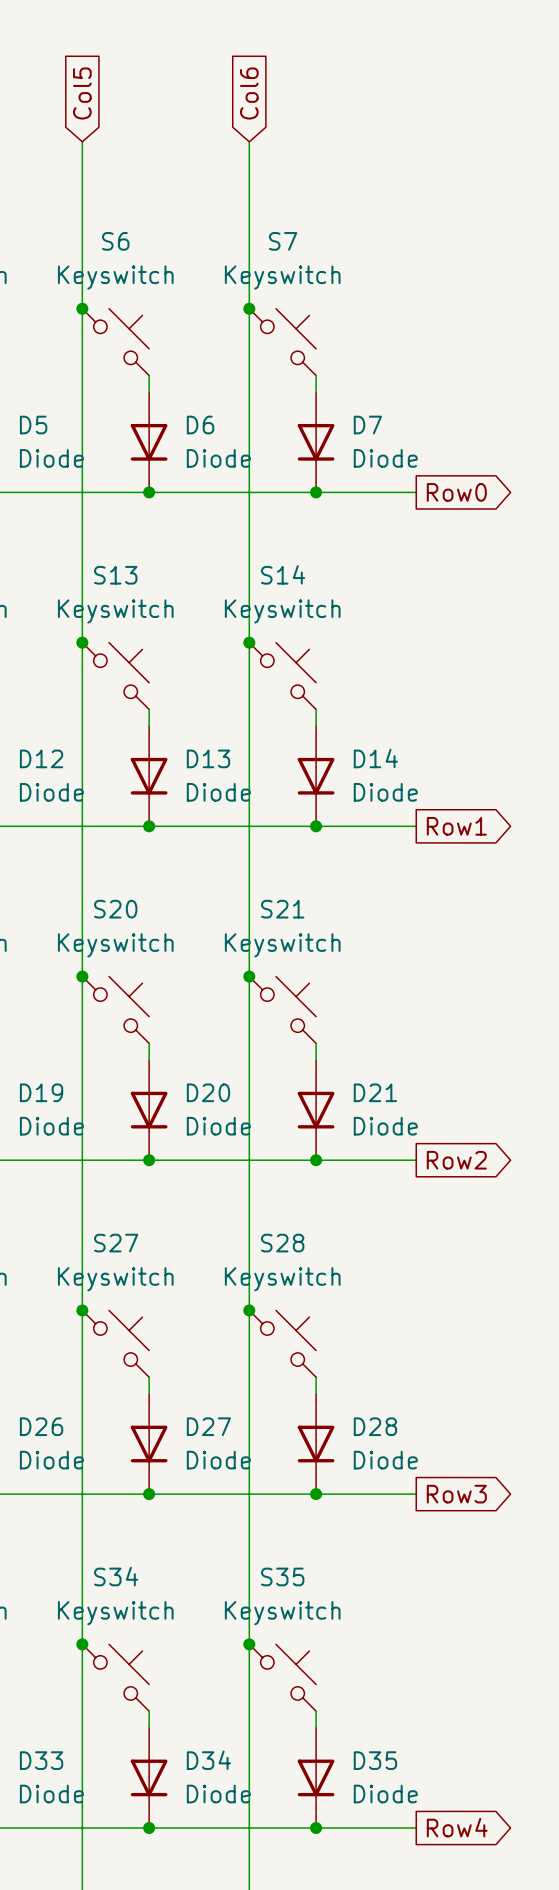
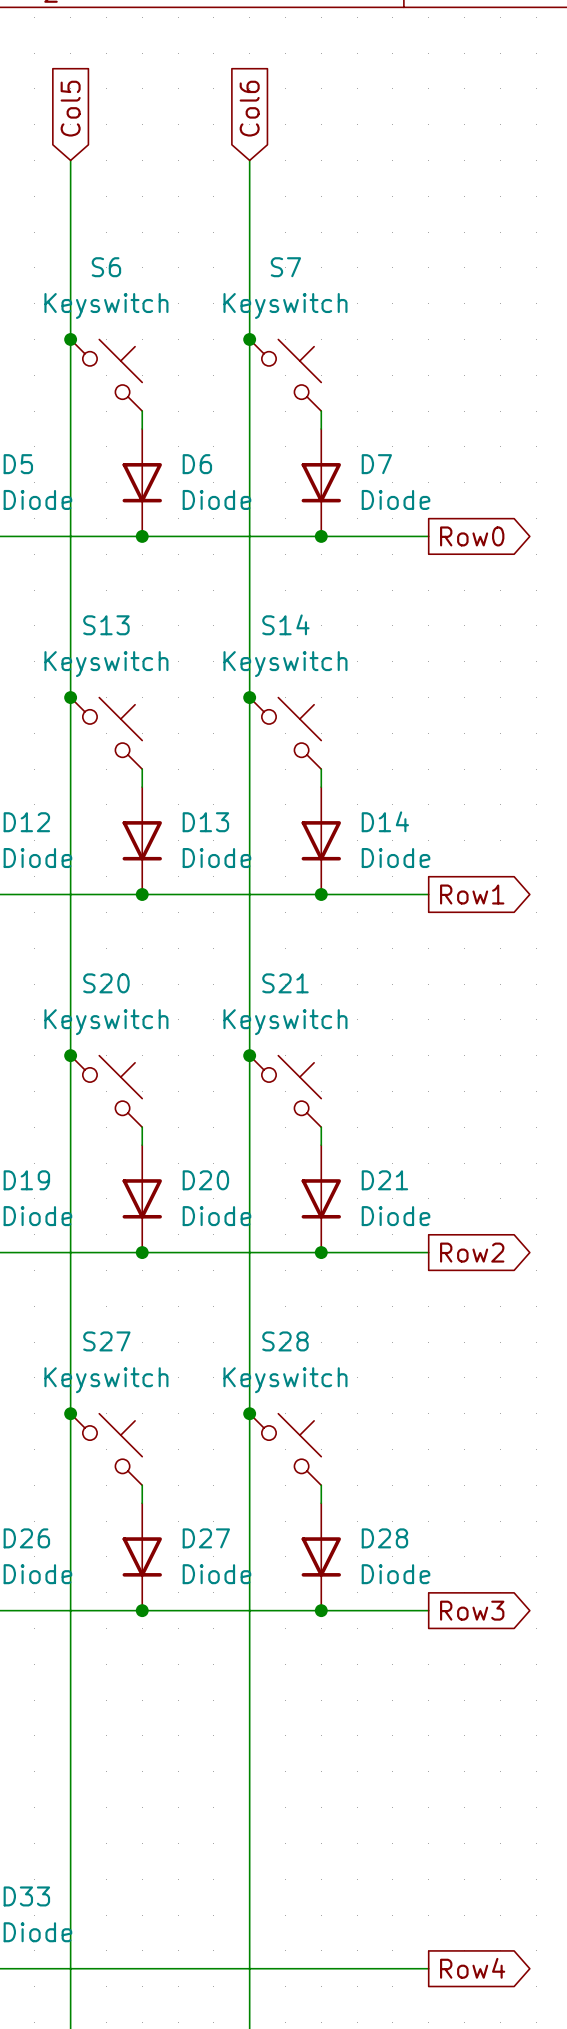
junction: (82, 1644) -> none
junction: (249, 1644) -> none
S34: Keyswitch (115, 1677) -> none
S35: Keyswitch (282, 1677) -> none
wire: (149, 1711) (149, 1727) -> none
wire: (316, 1711) (316, 1727) -> none
D34: Diode (149, 1777) -> none
D35: Diode (316, 1777) -> none
junction: (149, 1828) -> none
junction: (316, 1828) -> none

